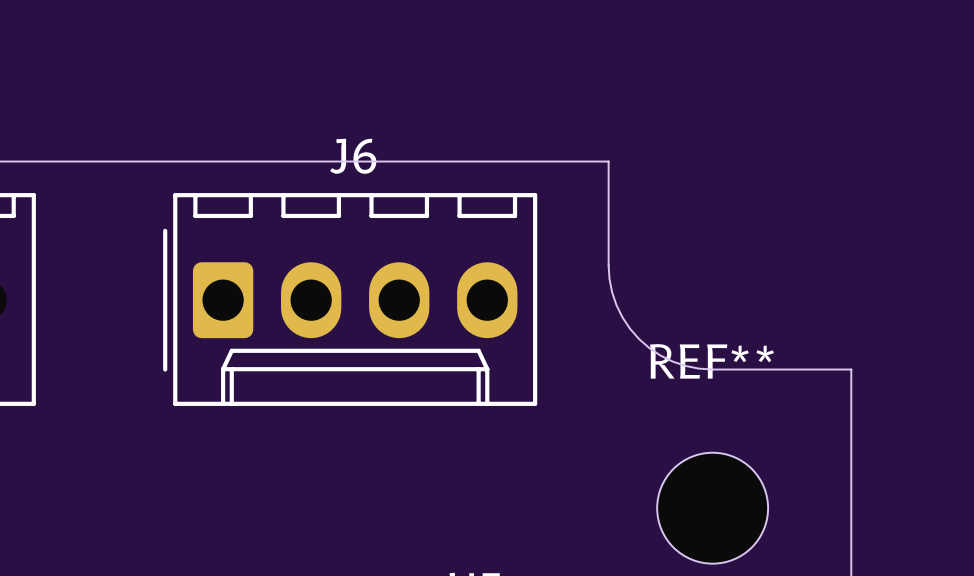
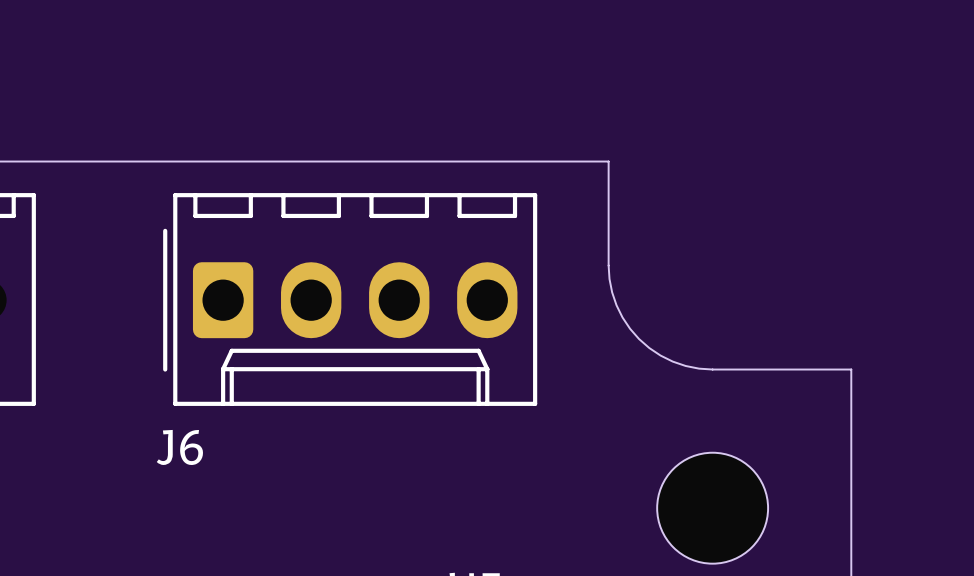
J6 name position: J6 (353, 156) -> J6 (179, 447)
REF** name: REF** (711, 361) -> none

